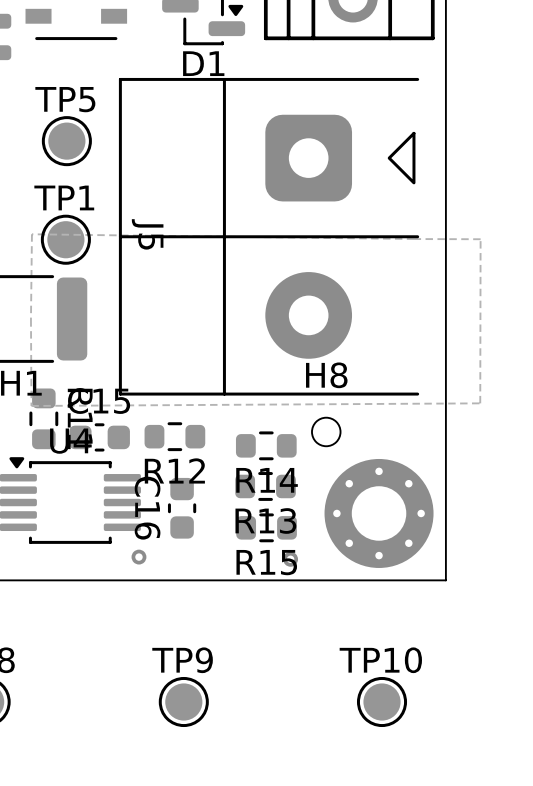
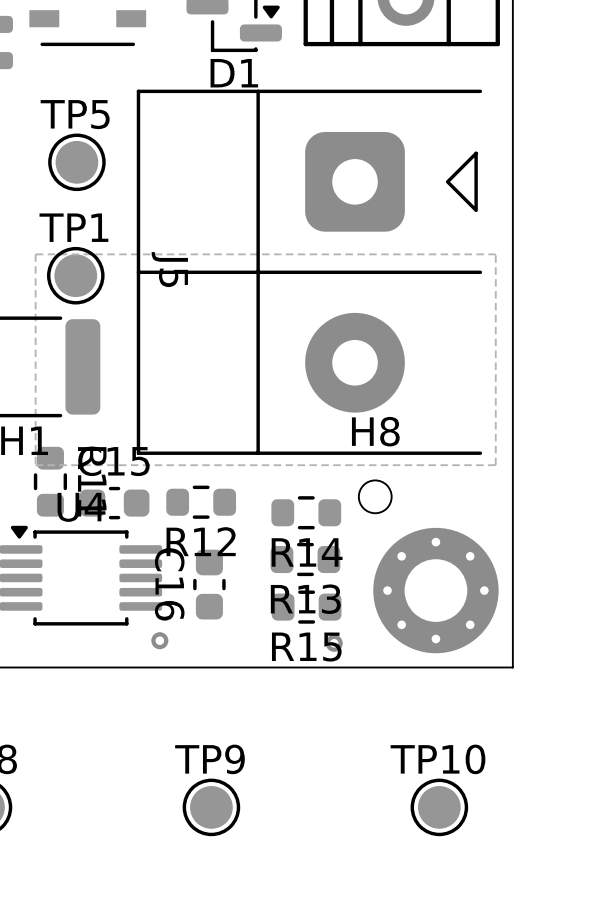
zone outline: (31, 234) (480, 239) (480, 403) (31, 405) (31, 234) -> (495, 254) (495, 465) (35, 465) (35, 254) (495, 254)

